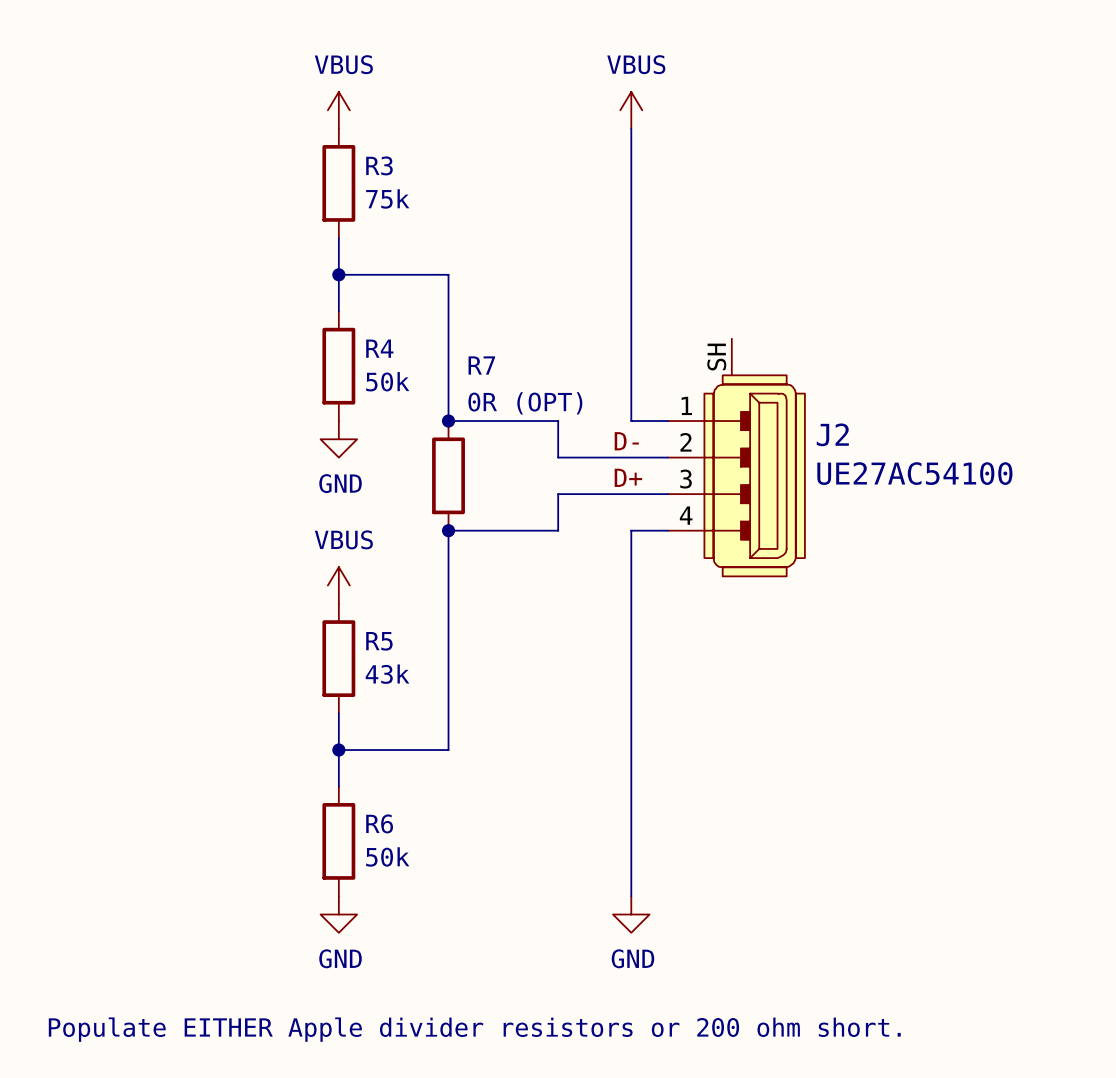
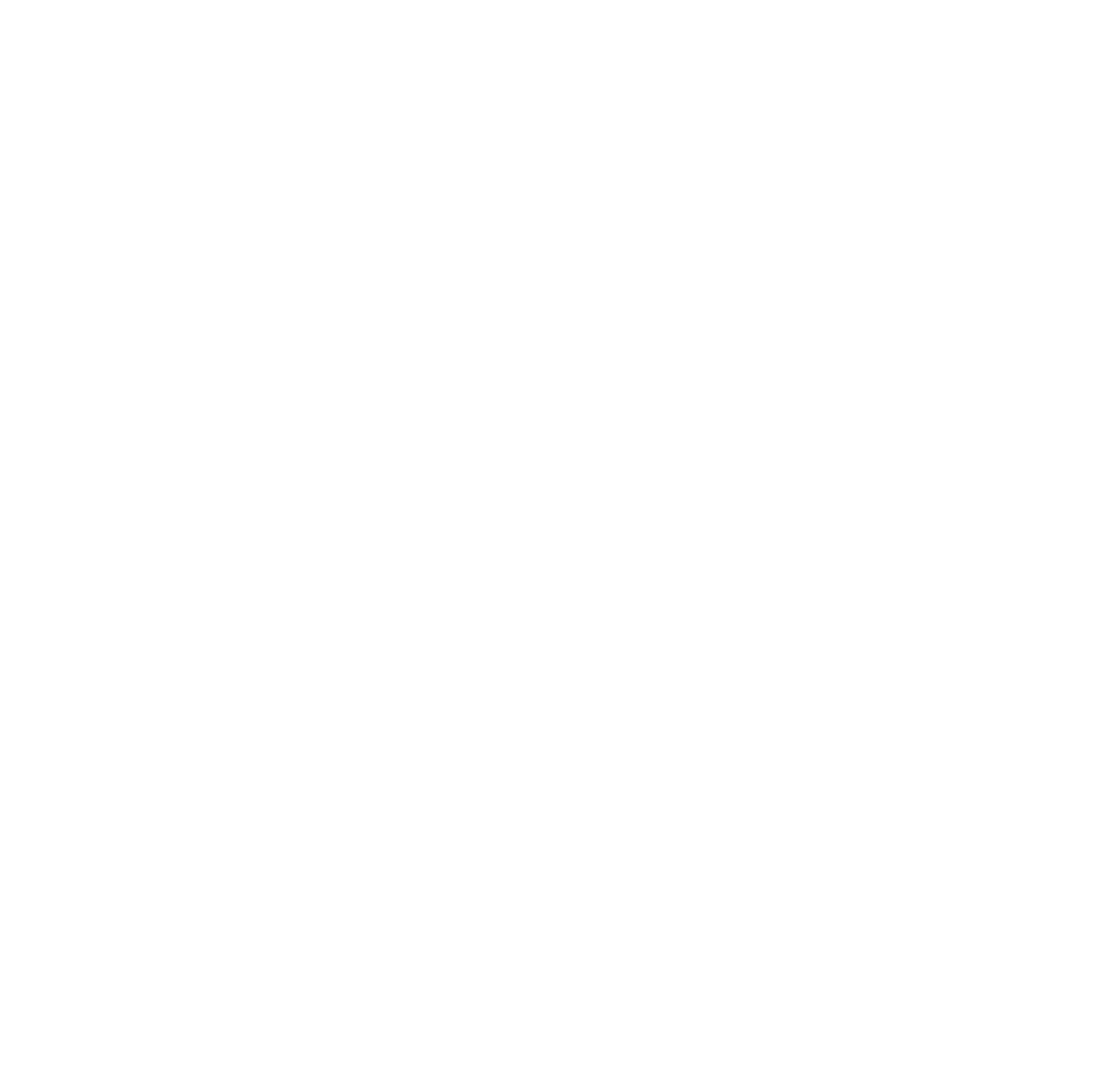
power symbol: VBUS (338, 110) -> none
power symbol: VBUS (631, 110) -> none
wire: (631, 128) (631, 421) (667, 421) -> none
R3: 75k (338, 183) -> none
wire: (338, 238) (338, 311) -> none
wire: (338, 274) (448, 274) (448, 421) (558, 421) (558, 457) (667, 457) -> none
junction: (338, 274) -> none
R4: 50k (338, 366) -> none
junction: (448, 421) -> none
power symbol: GND (338, 439) -> none
label: D- (626, 441) -> none
J2: UE27AC54100 (736, 457) -> none
R7: 0R (OPT) (448, 475) -> none
label: D+ (628, 477) -> none
wire: (667, 494) (558, 494) (558, 530) (448, 530) (448, 750) (338, 750) -> none
junction: (448, 530) -> none
wire: (667, 530) (631, 530) (631, 896) -> none
power symbol: VBUS (338, 585) -> none
R5: 43k (338, 658) -> none
wire: (338, 713) (338, 786) -> none
junction: (338, 750) -> none
R6: 50k (338, 841) -> none
power symbol: GND (338, 914) -> none
power symbol: GND (631, 914) -> none
text: Populate EITHER Apple divider resistors or 200 ohm short. (474, 1029) -> none

